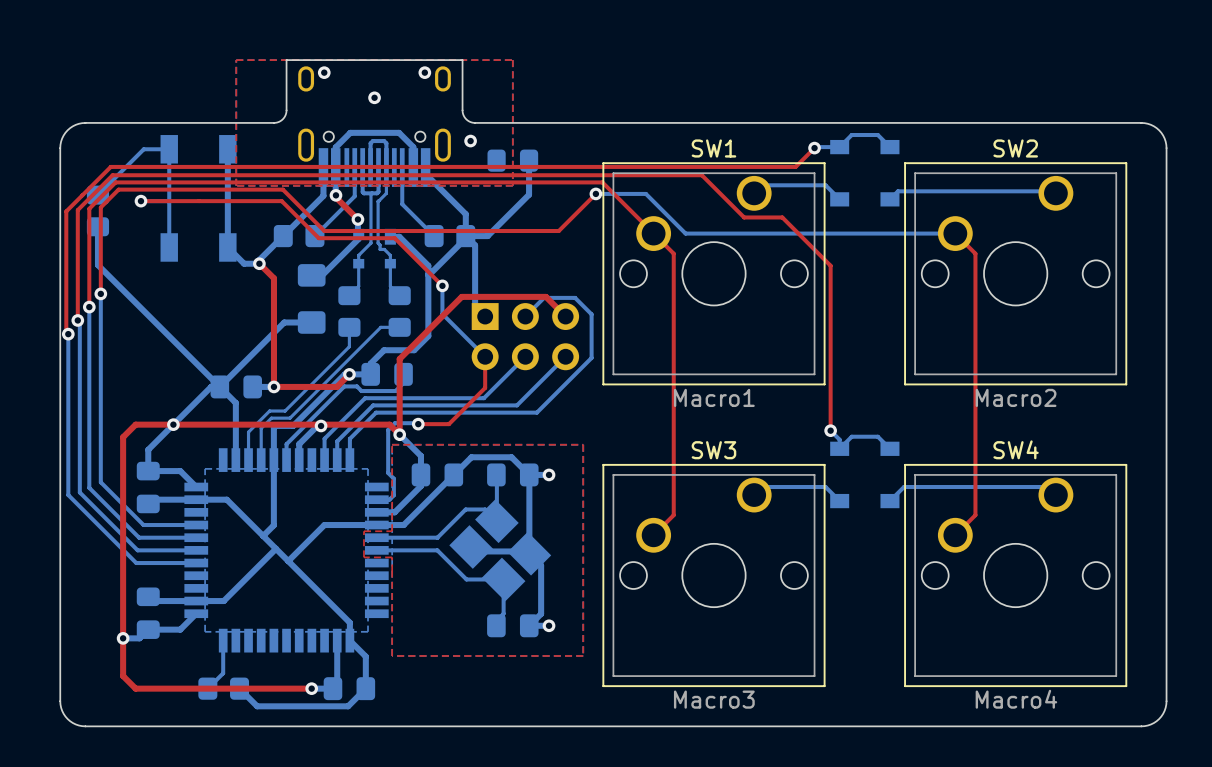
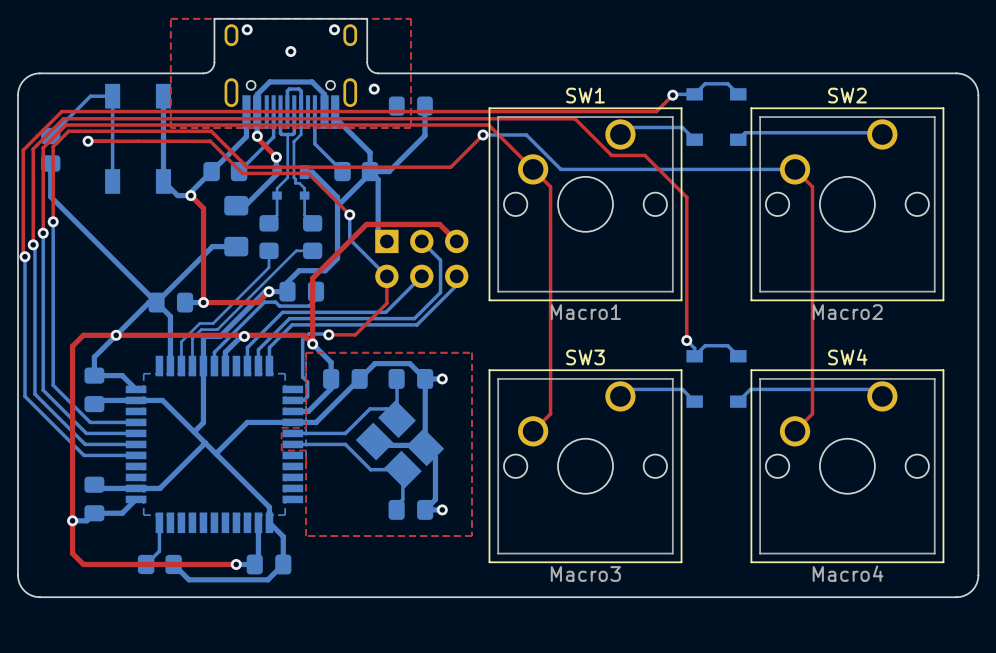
bottom track: (525, 316) (544, 297) (575, 297) (591, 314) (591, 357) (536, 412) (519, 412) -> (421, 241) (440, 260) (440, 292)
bottom track: (565, 356) (546, 375) -> none
bottom track: none -> (461, 280) (417, 324)

